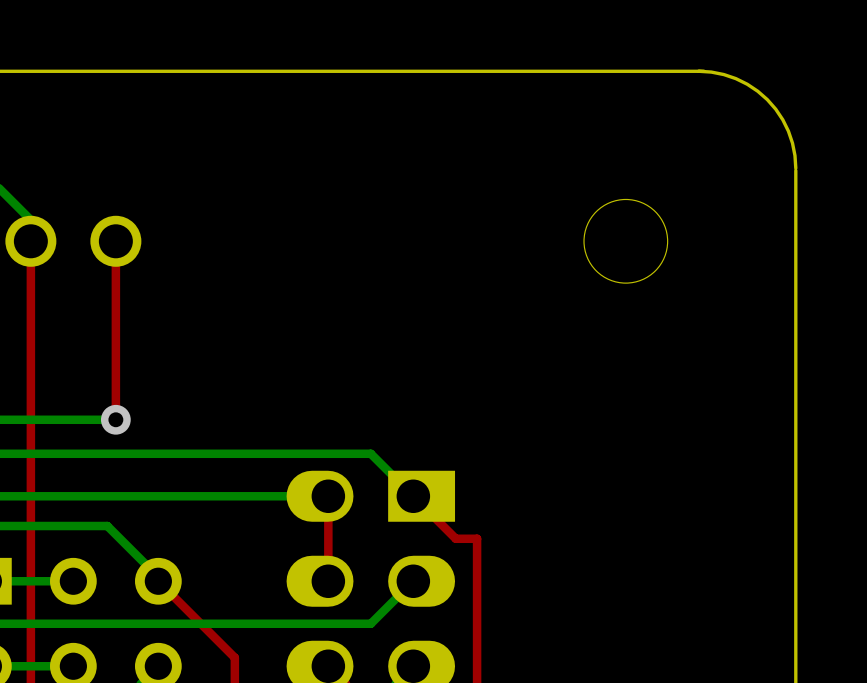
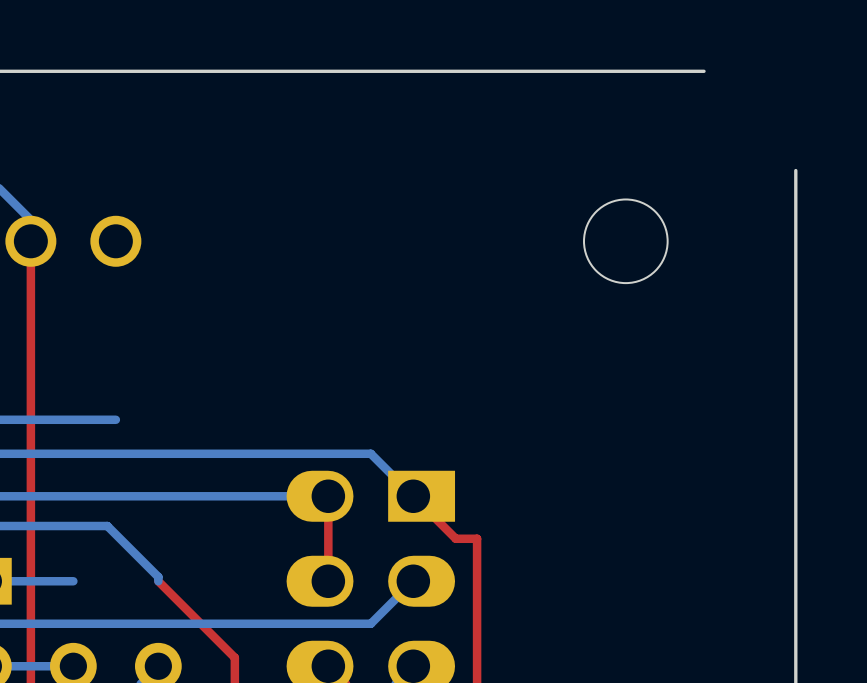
board edge: (698, 71) (723, 74) (735, 78) (747, 84) (767, 99) (782, 119) (788, 131) (792, 143) (795, 168) -> none
top track: (115, 241) (115, 419) -> none
via: (115, 419) -> none
part: (115, 581) -> none

